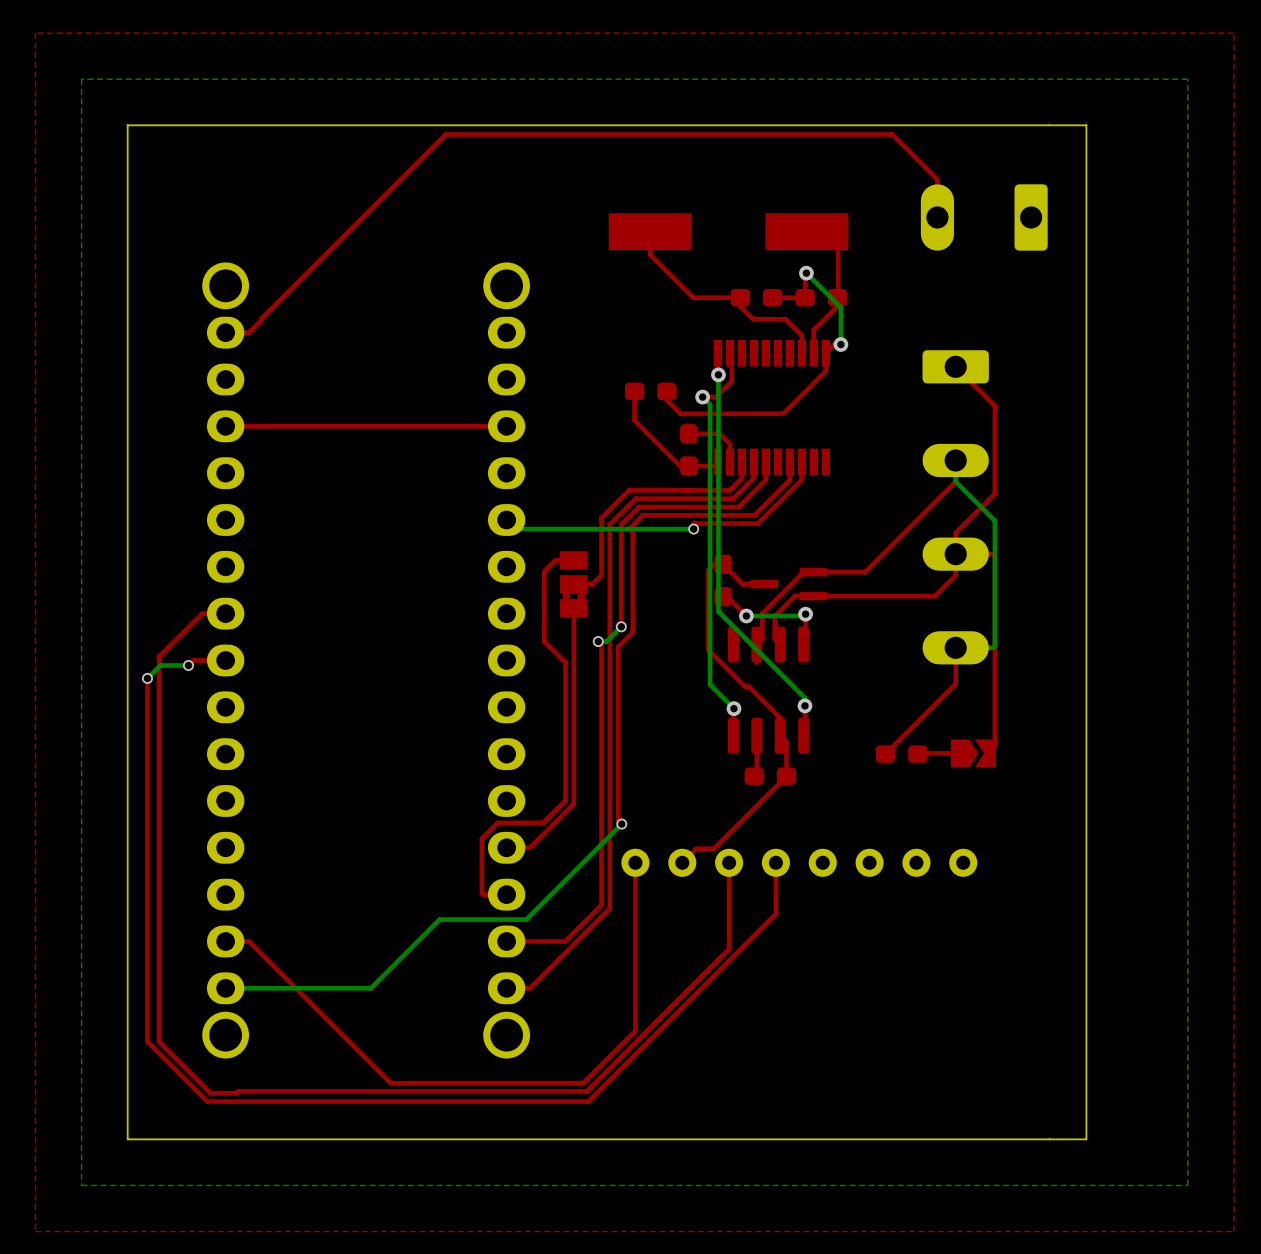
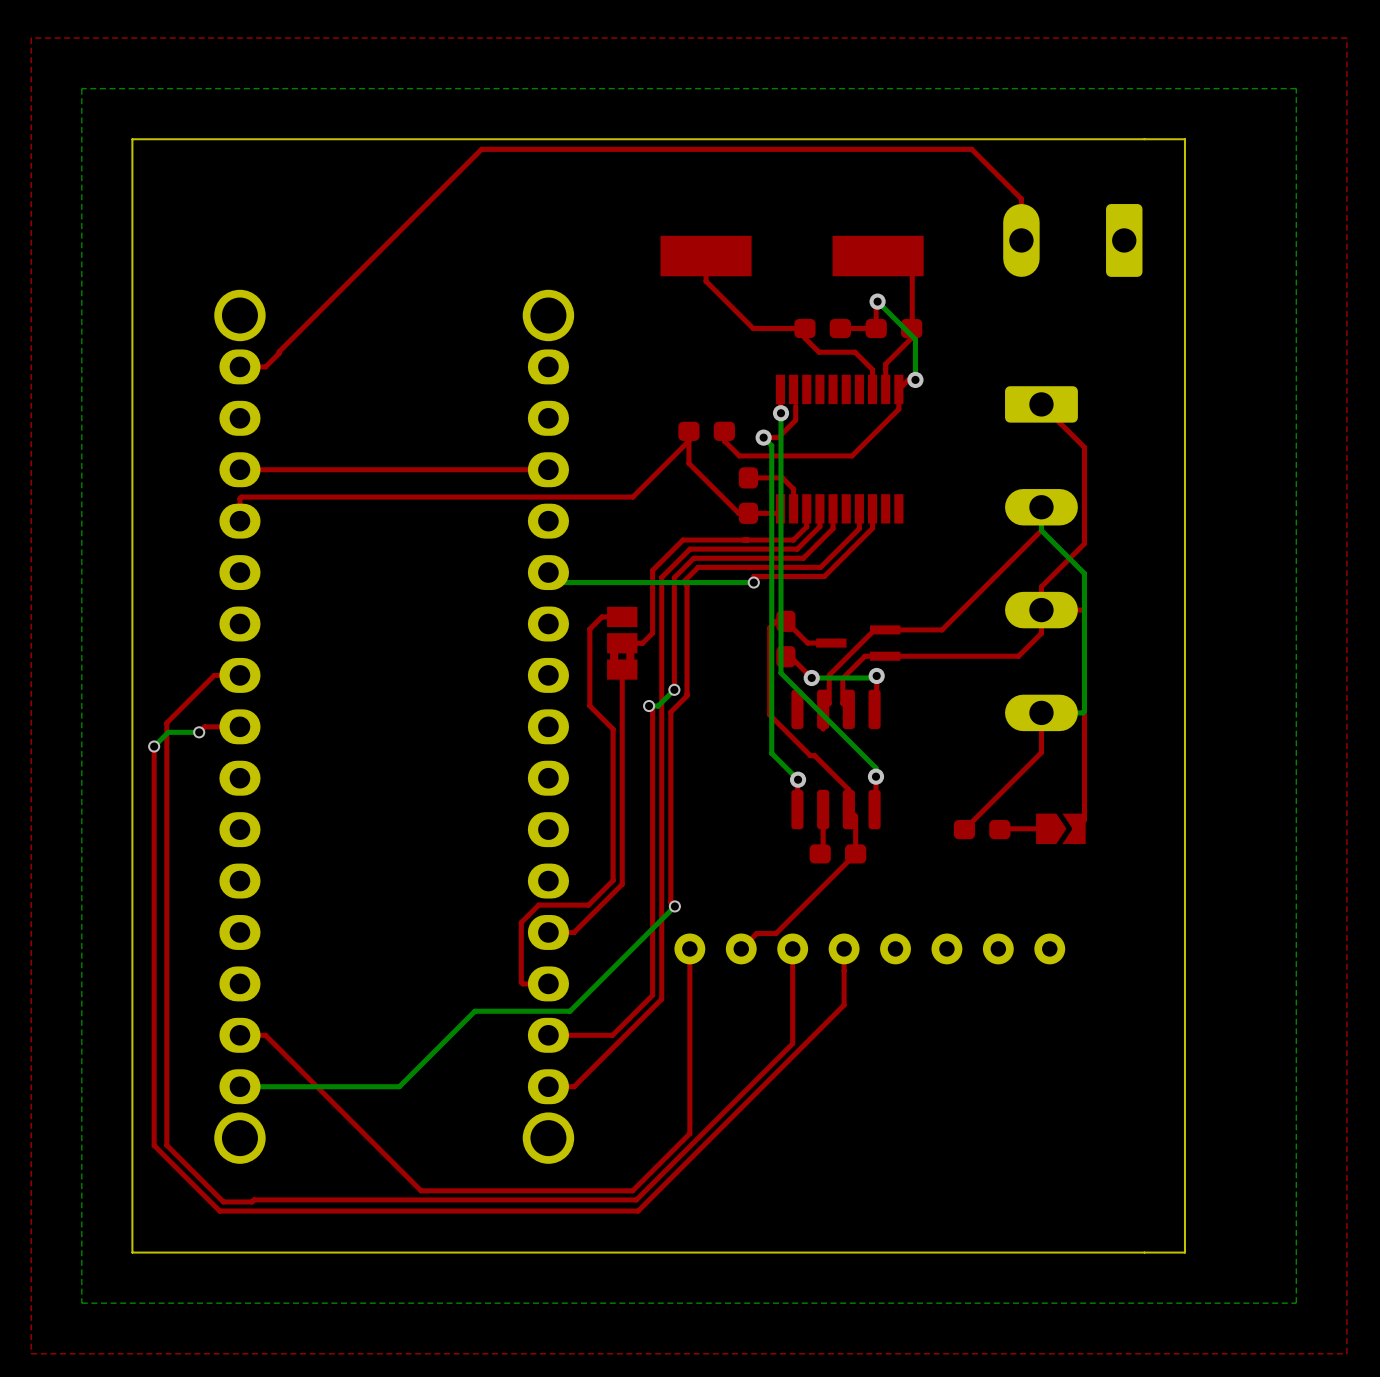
top track: none -> (688, 440) (632, 497) (241, 497) (239, 521)

